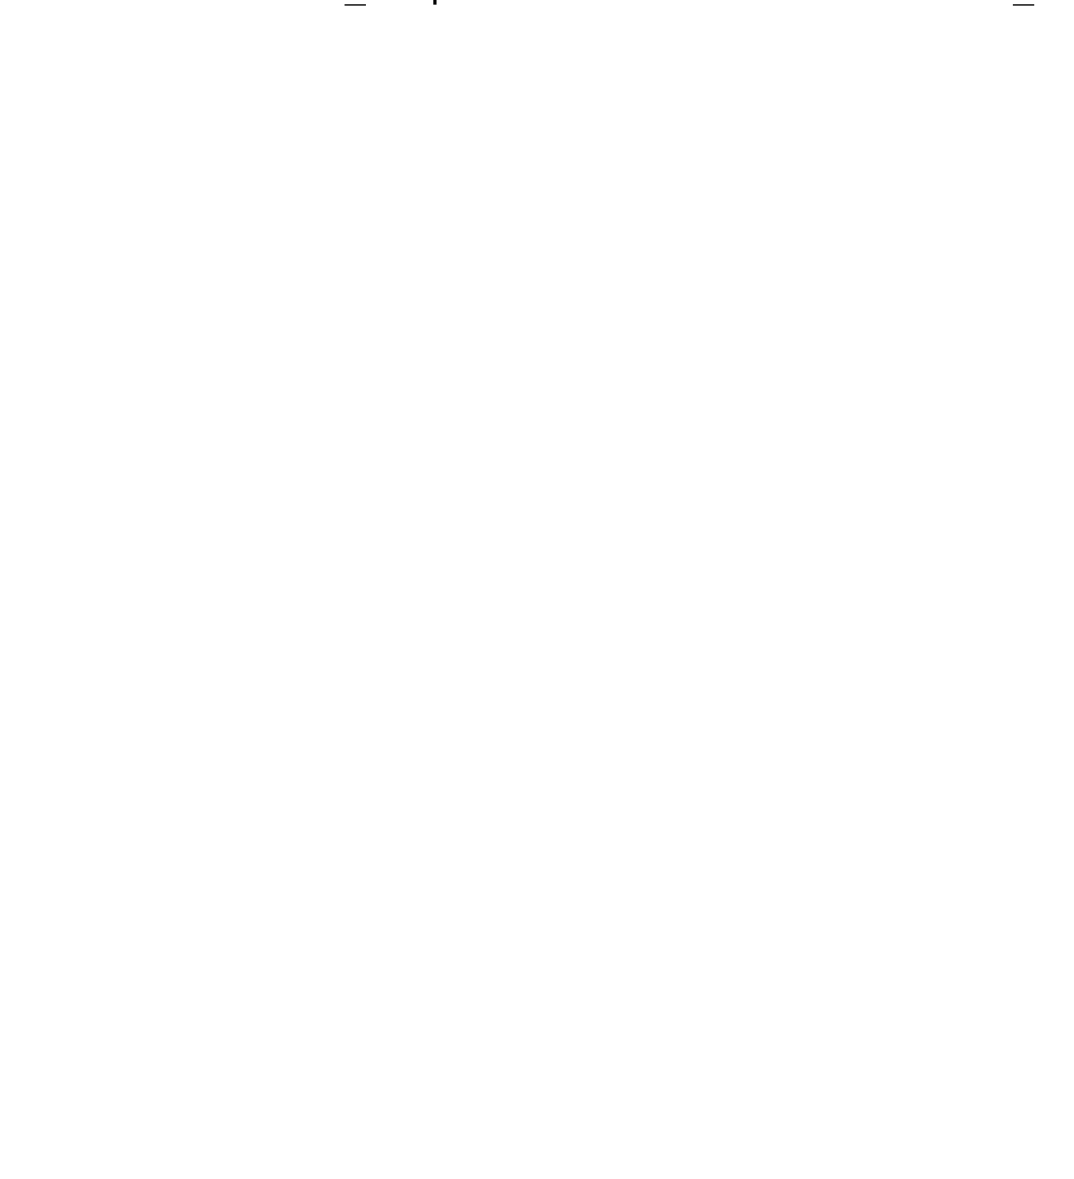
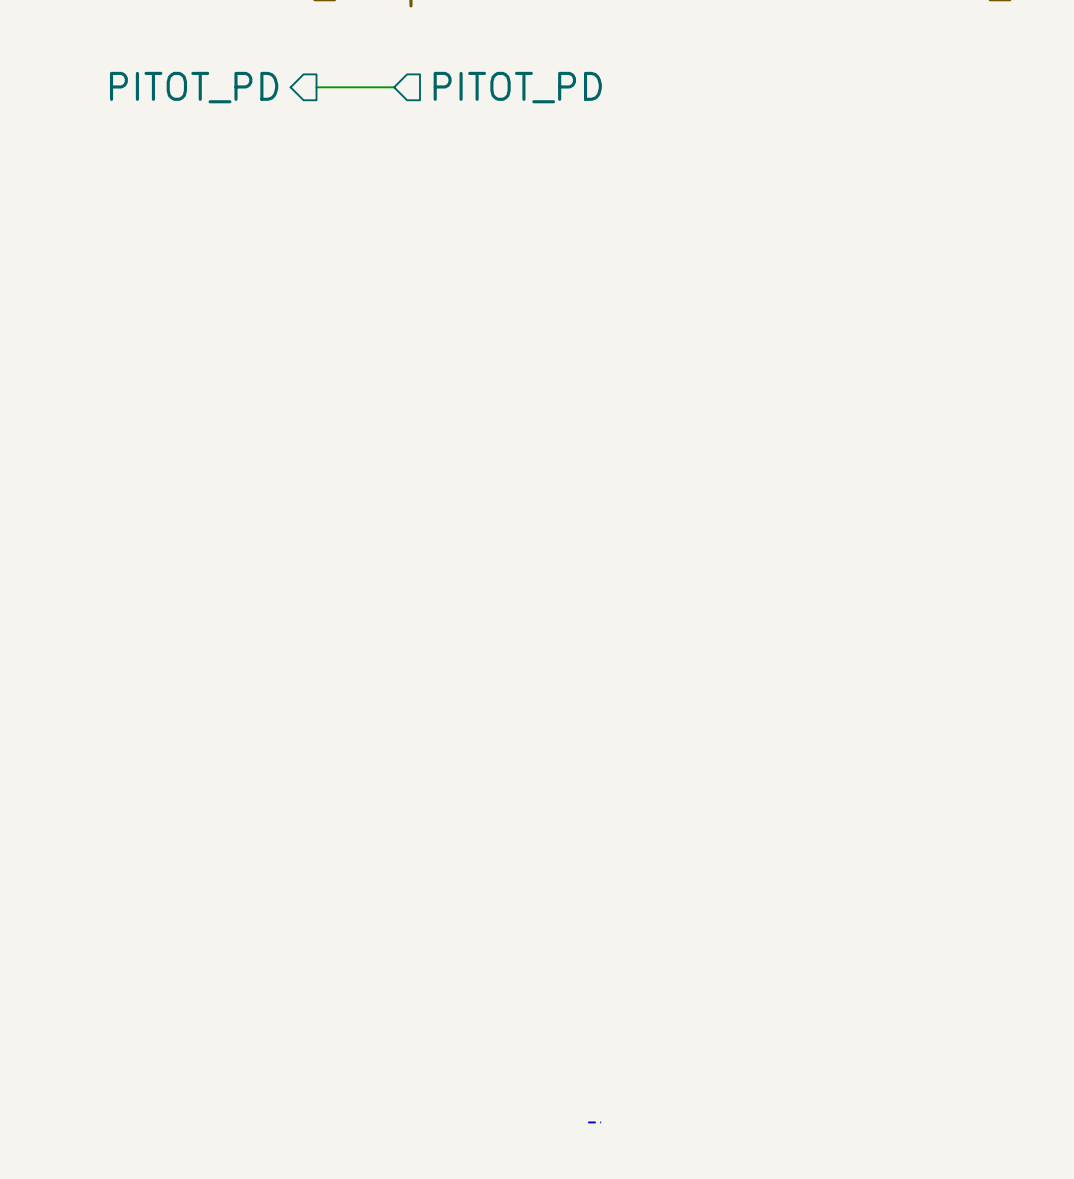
wire: none -> (316, 87) (394, 87)
sheet pin: none -> PITOT_PD (194, 87)
sheet pin: none -> PITOT_PD (517, 87)
line: none -> (588, 1122) (601, 1122)

